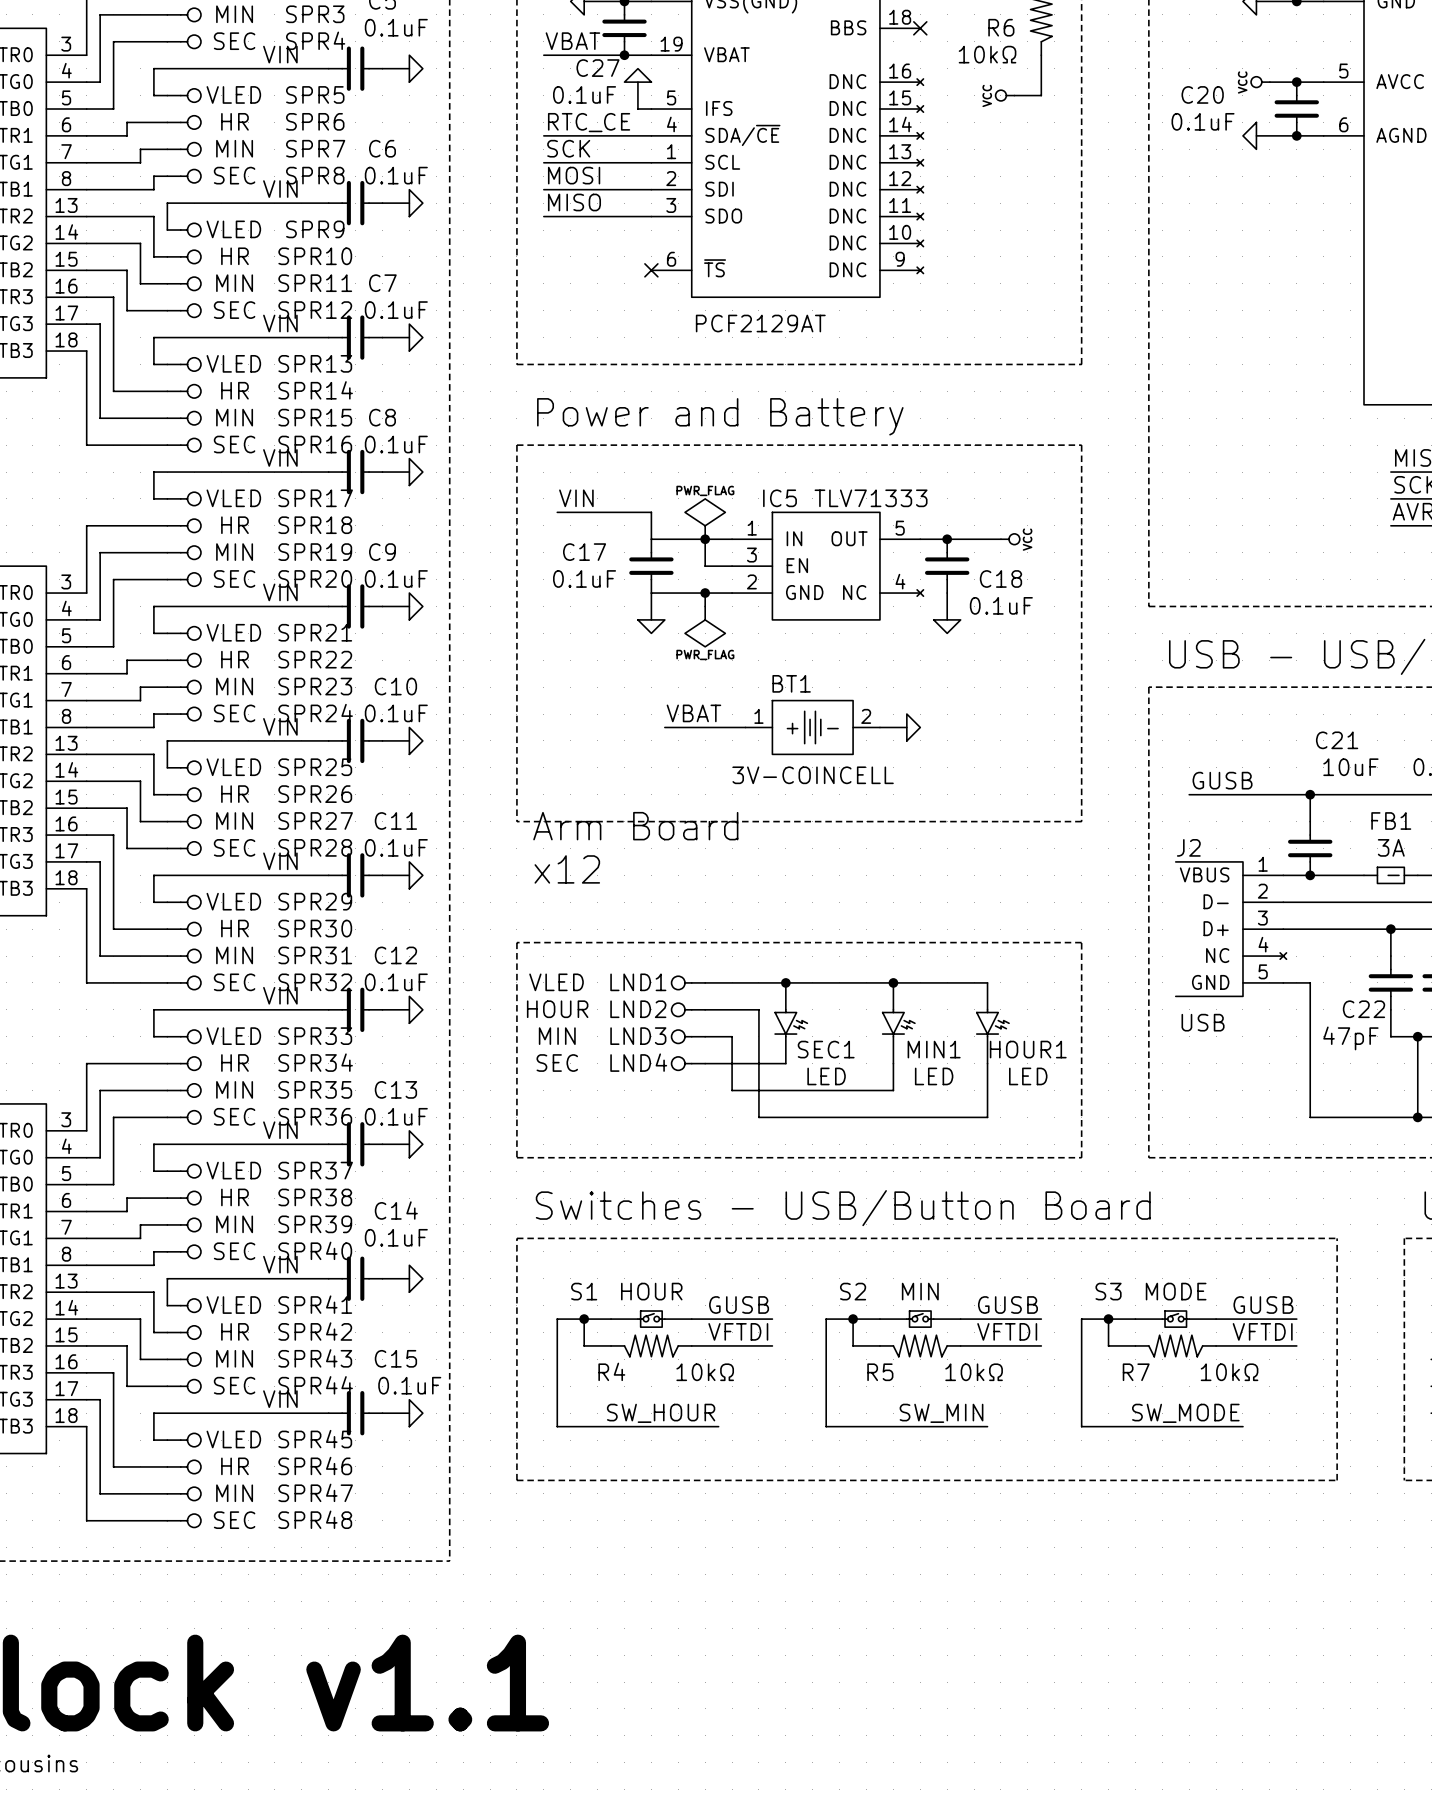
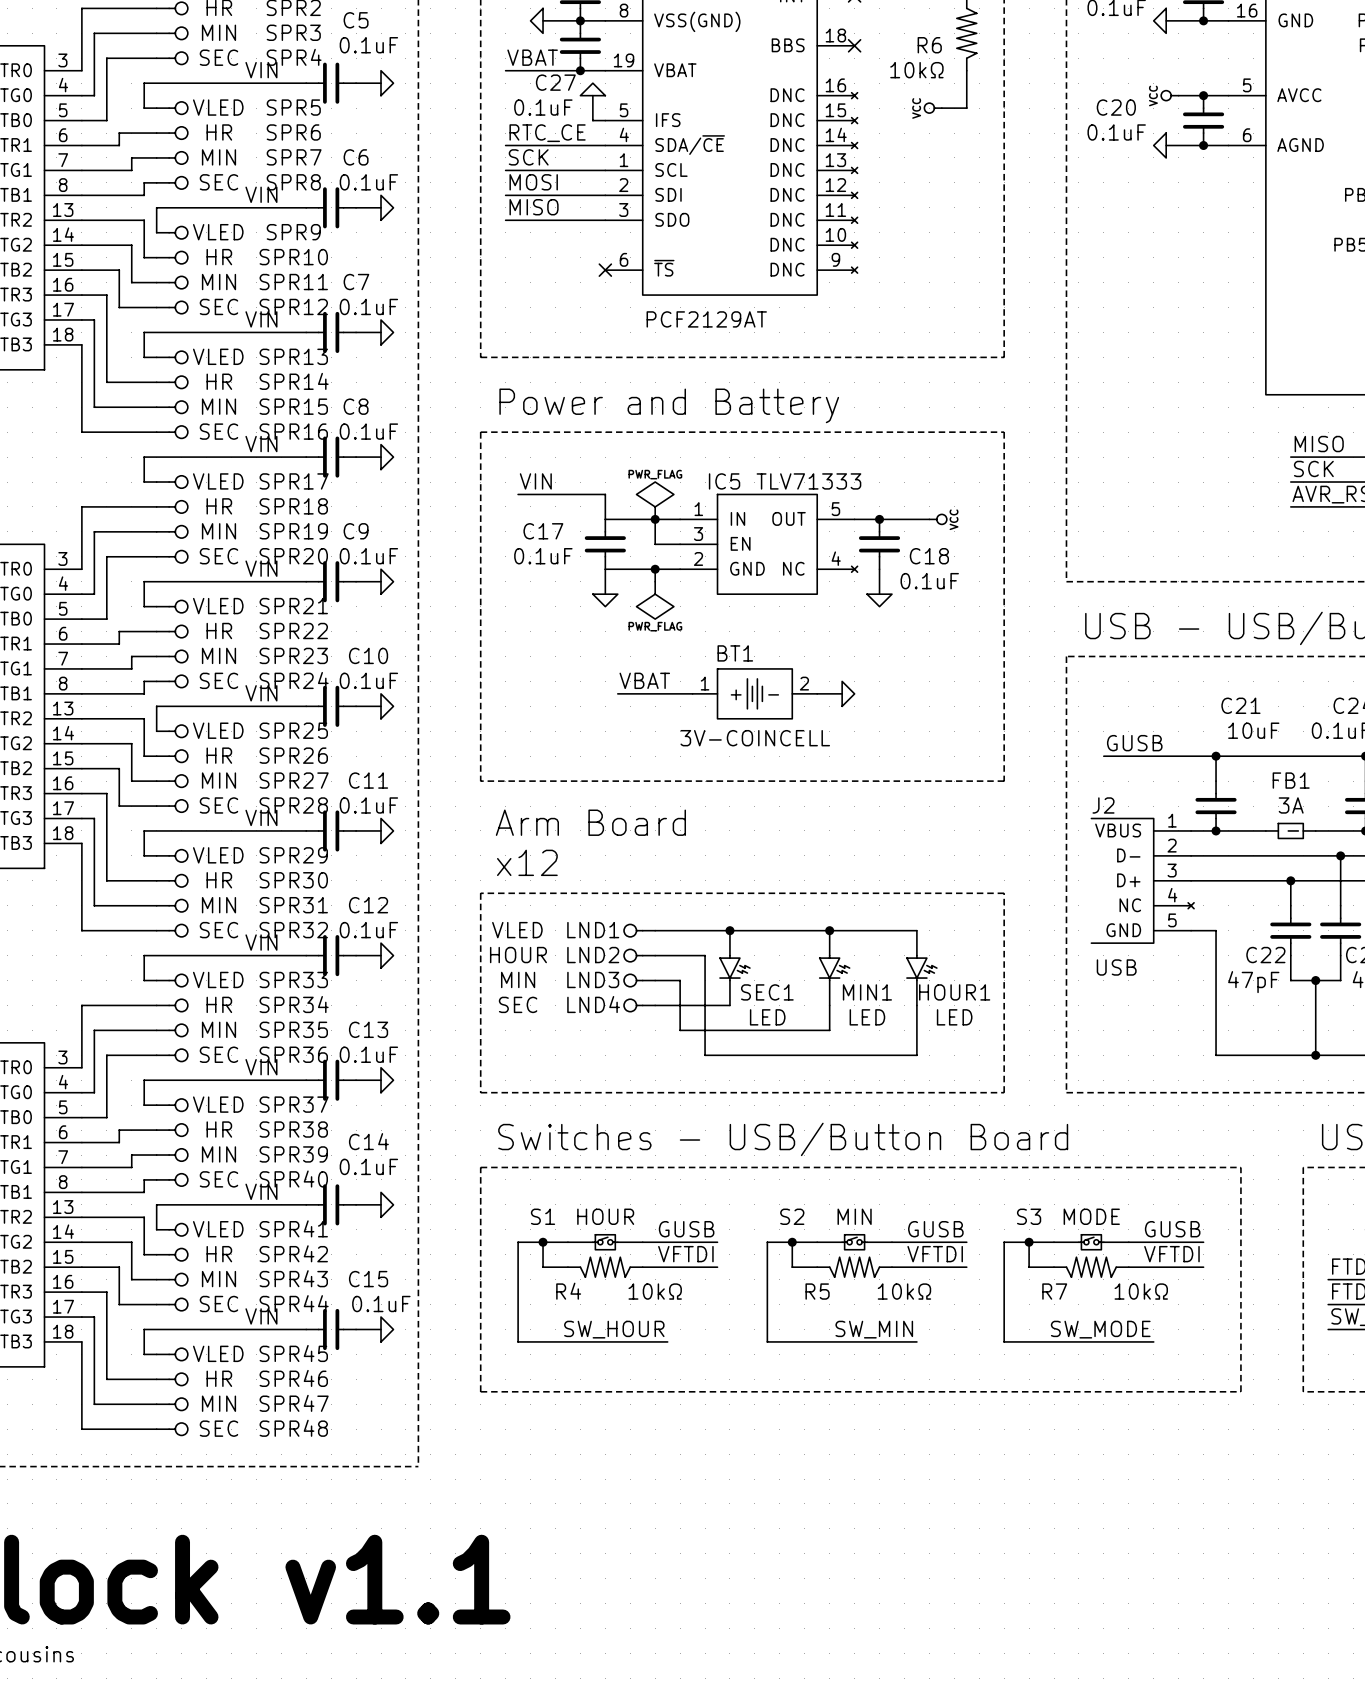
text position: Arm Board (635, 826) -> Arm Board (590, 822)
text position: x12 (567, 869) -> x12 (527, 862)

